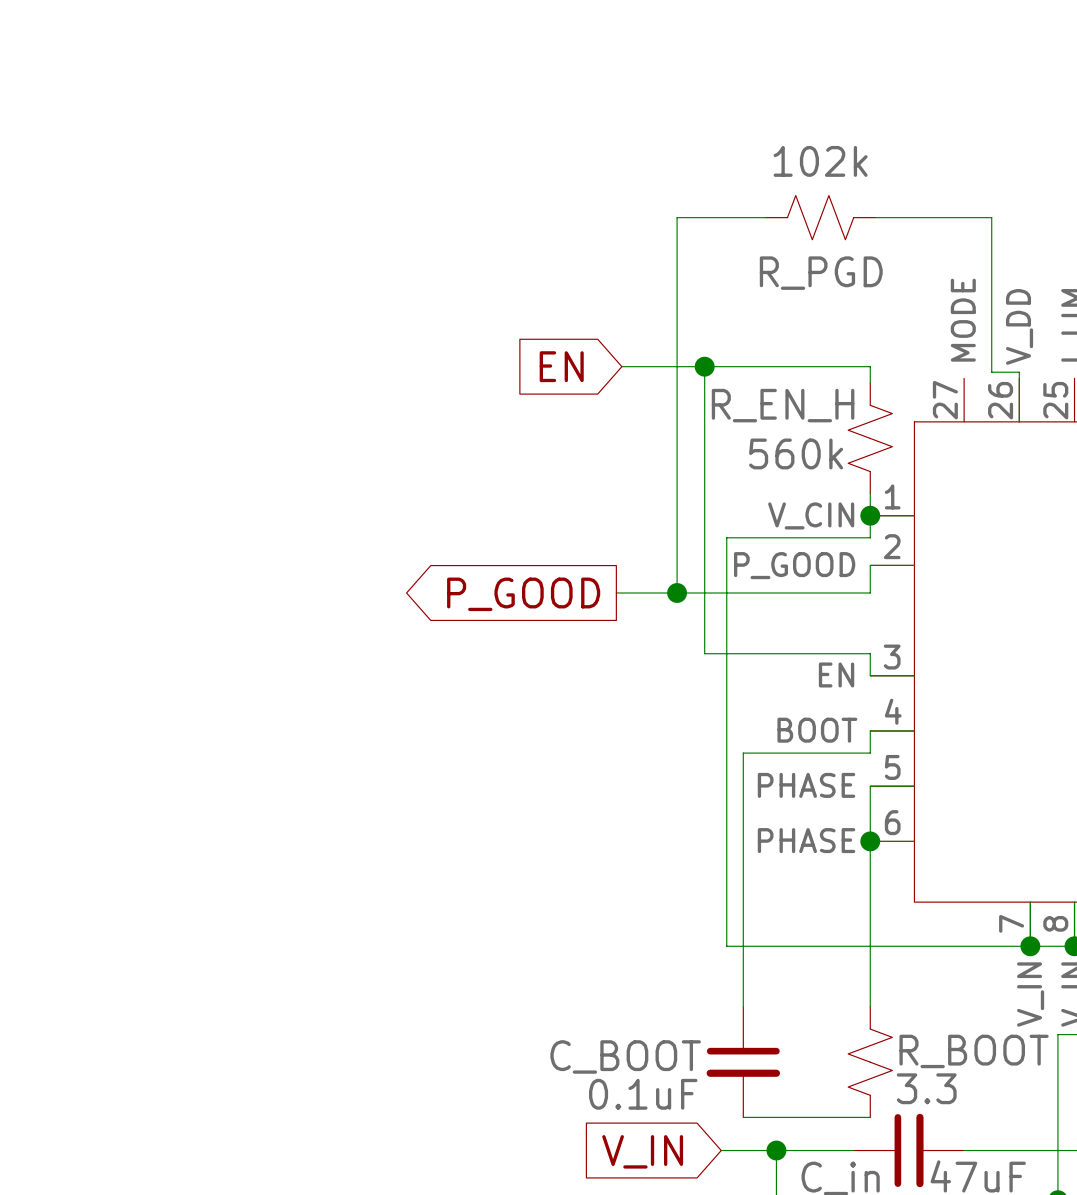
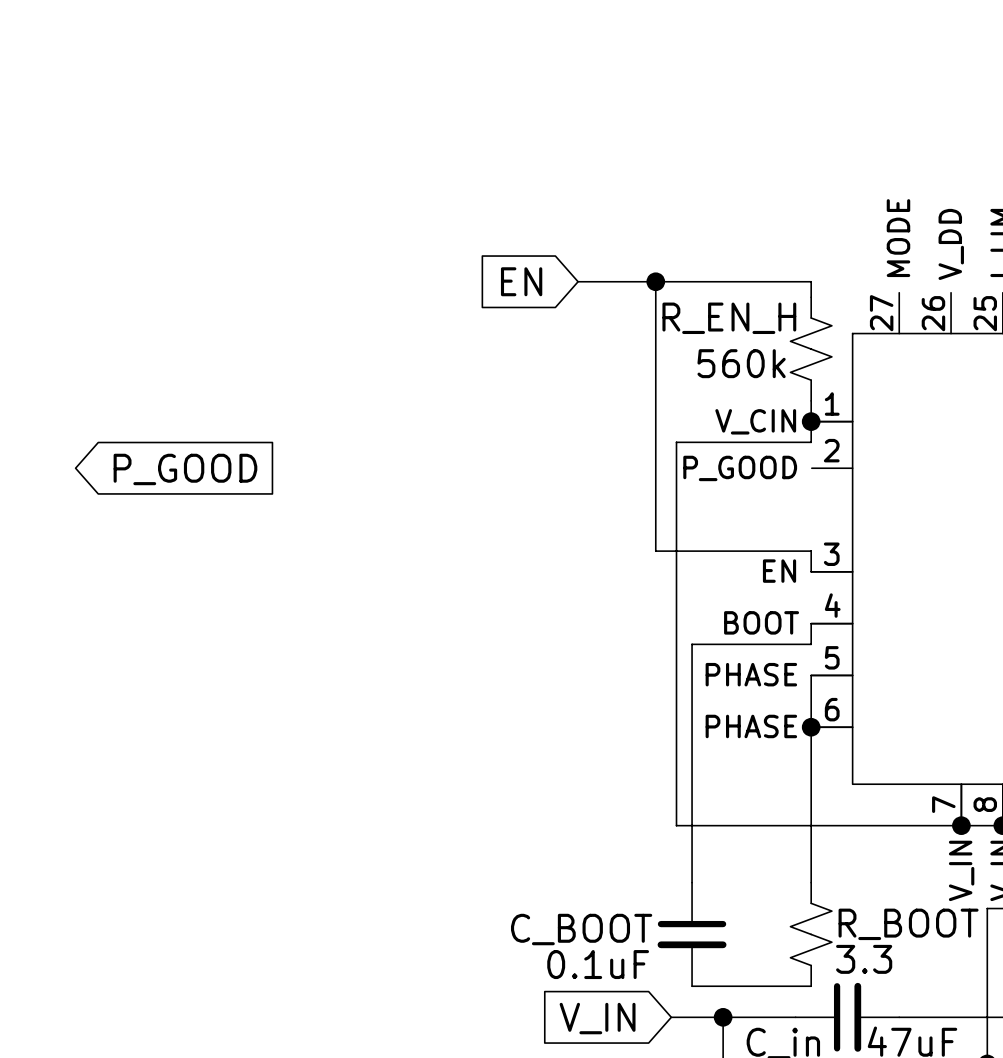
wire: (765, 217) (677, 217) (677, 593) -> none
R_PGD: 102k (820, 217) -> none
wire: (875, 217) (991, 217) (991, 372) (1019, 372) (1019, 421) -> none
wire: (914, 565) (870, 565) (870, 593) (616, 593) -> none
junction: (677, 593) -> none
global label position: P_GOOD (523, 594) -> P_GOOD (185, 469)

